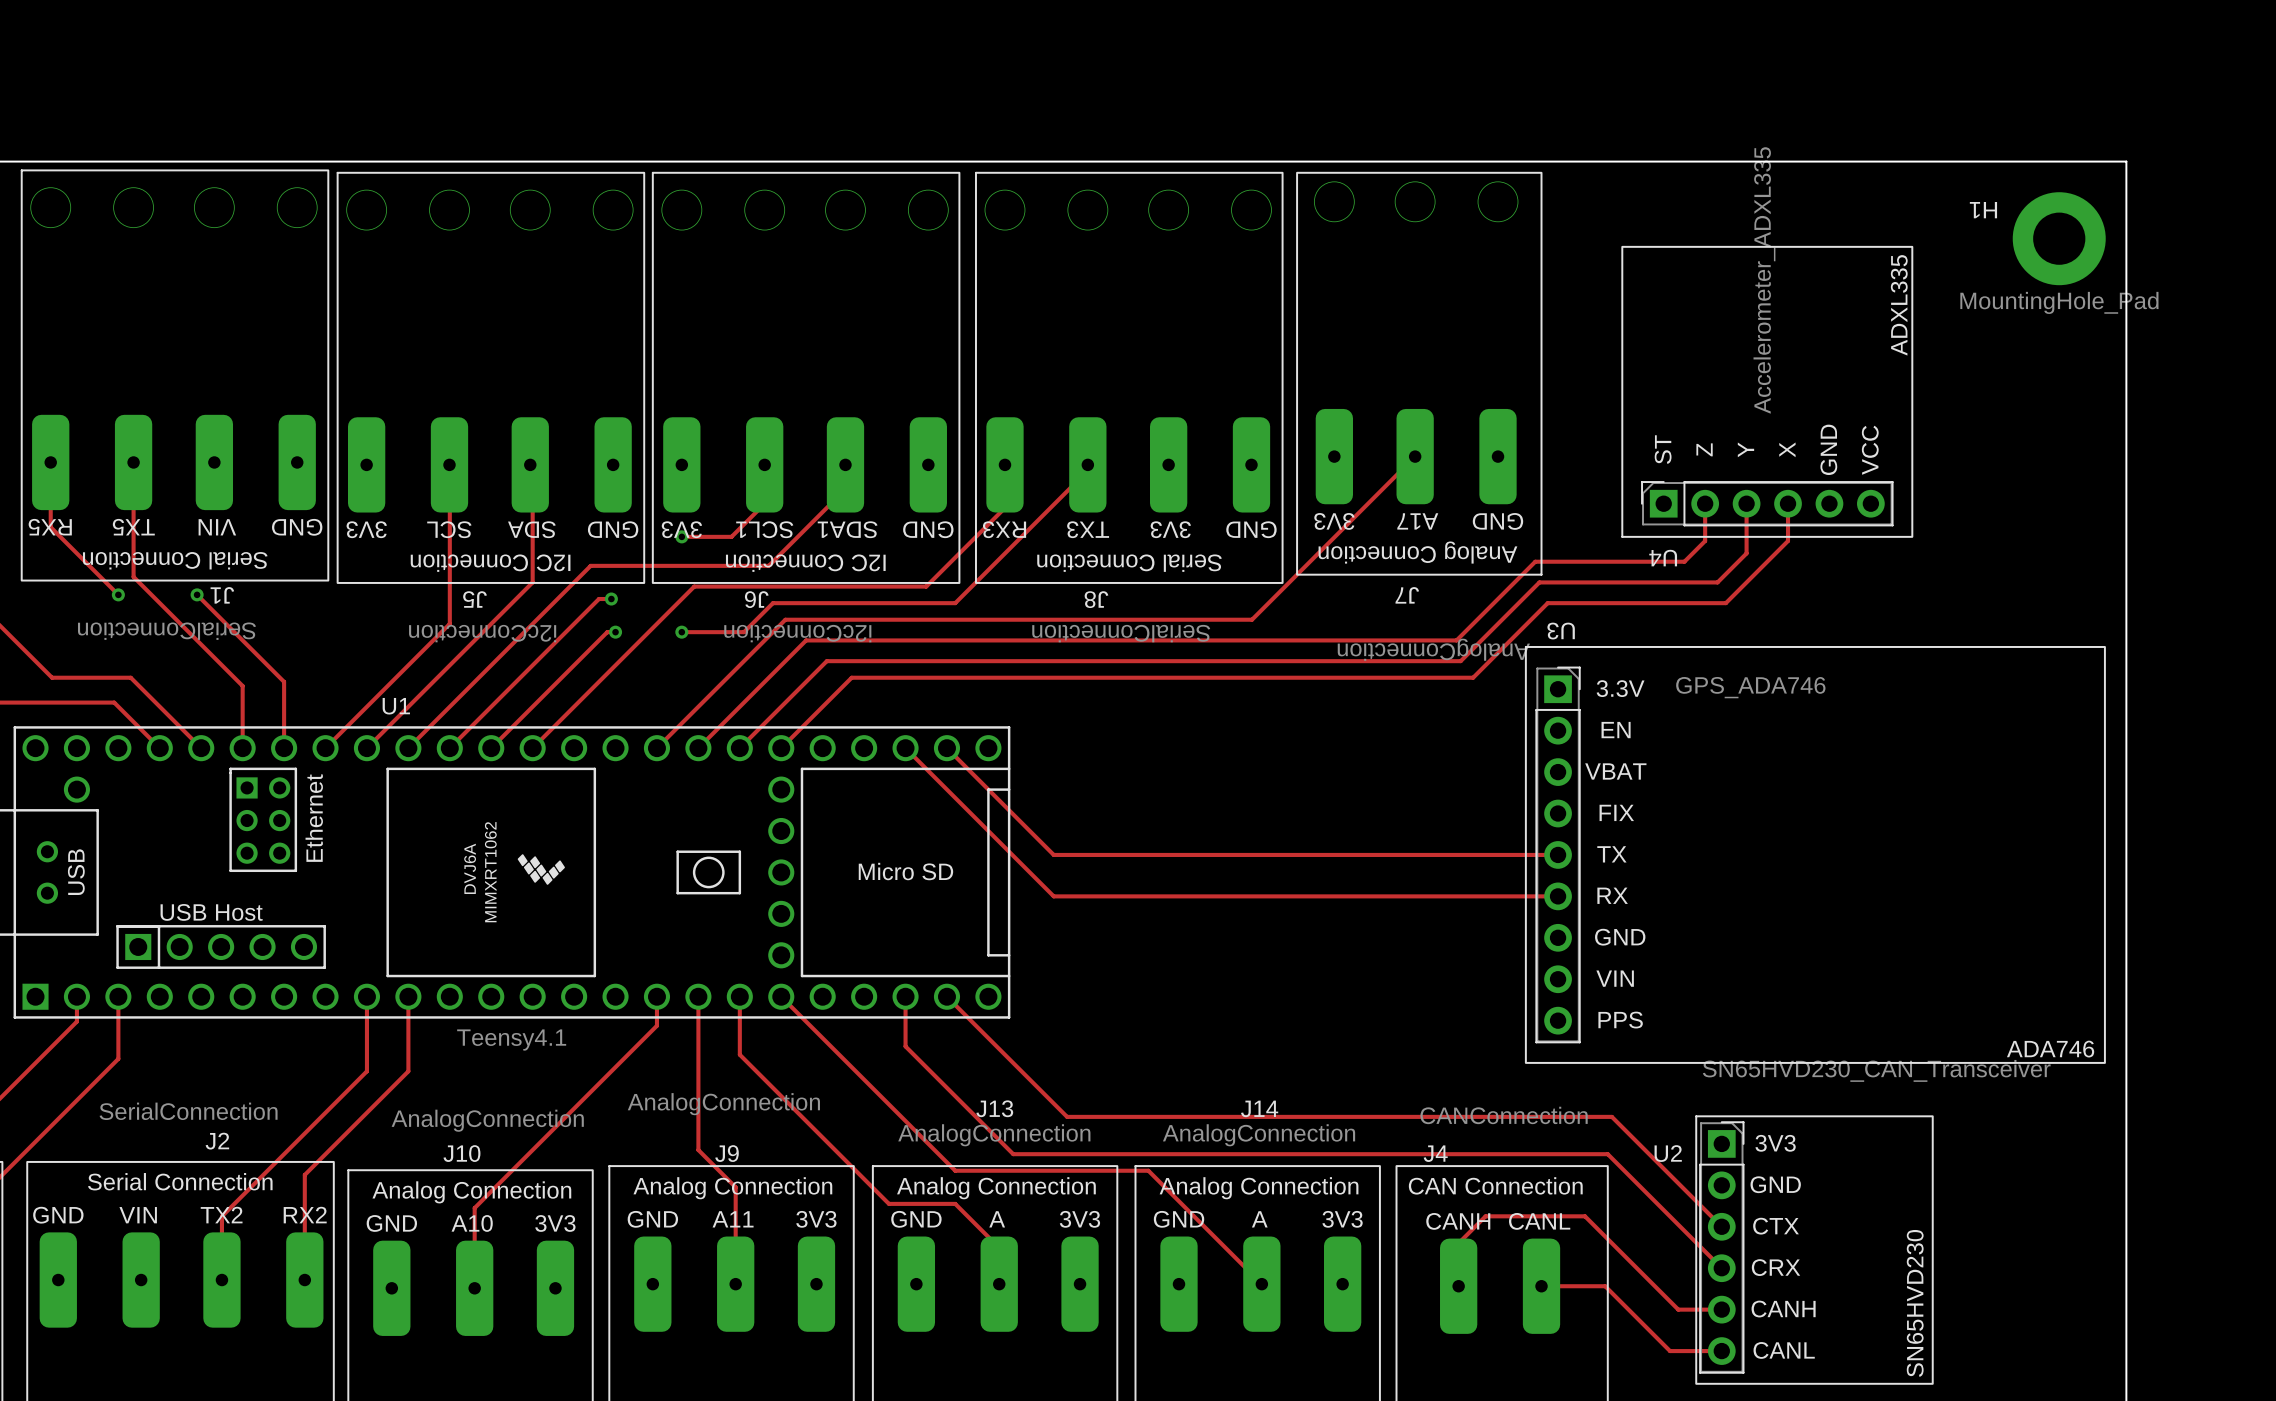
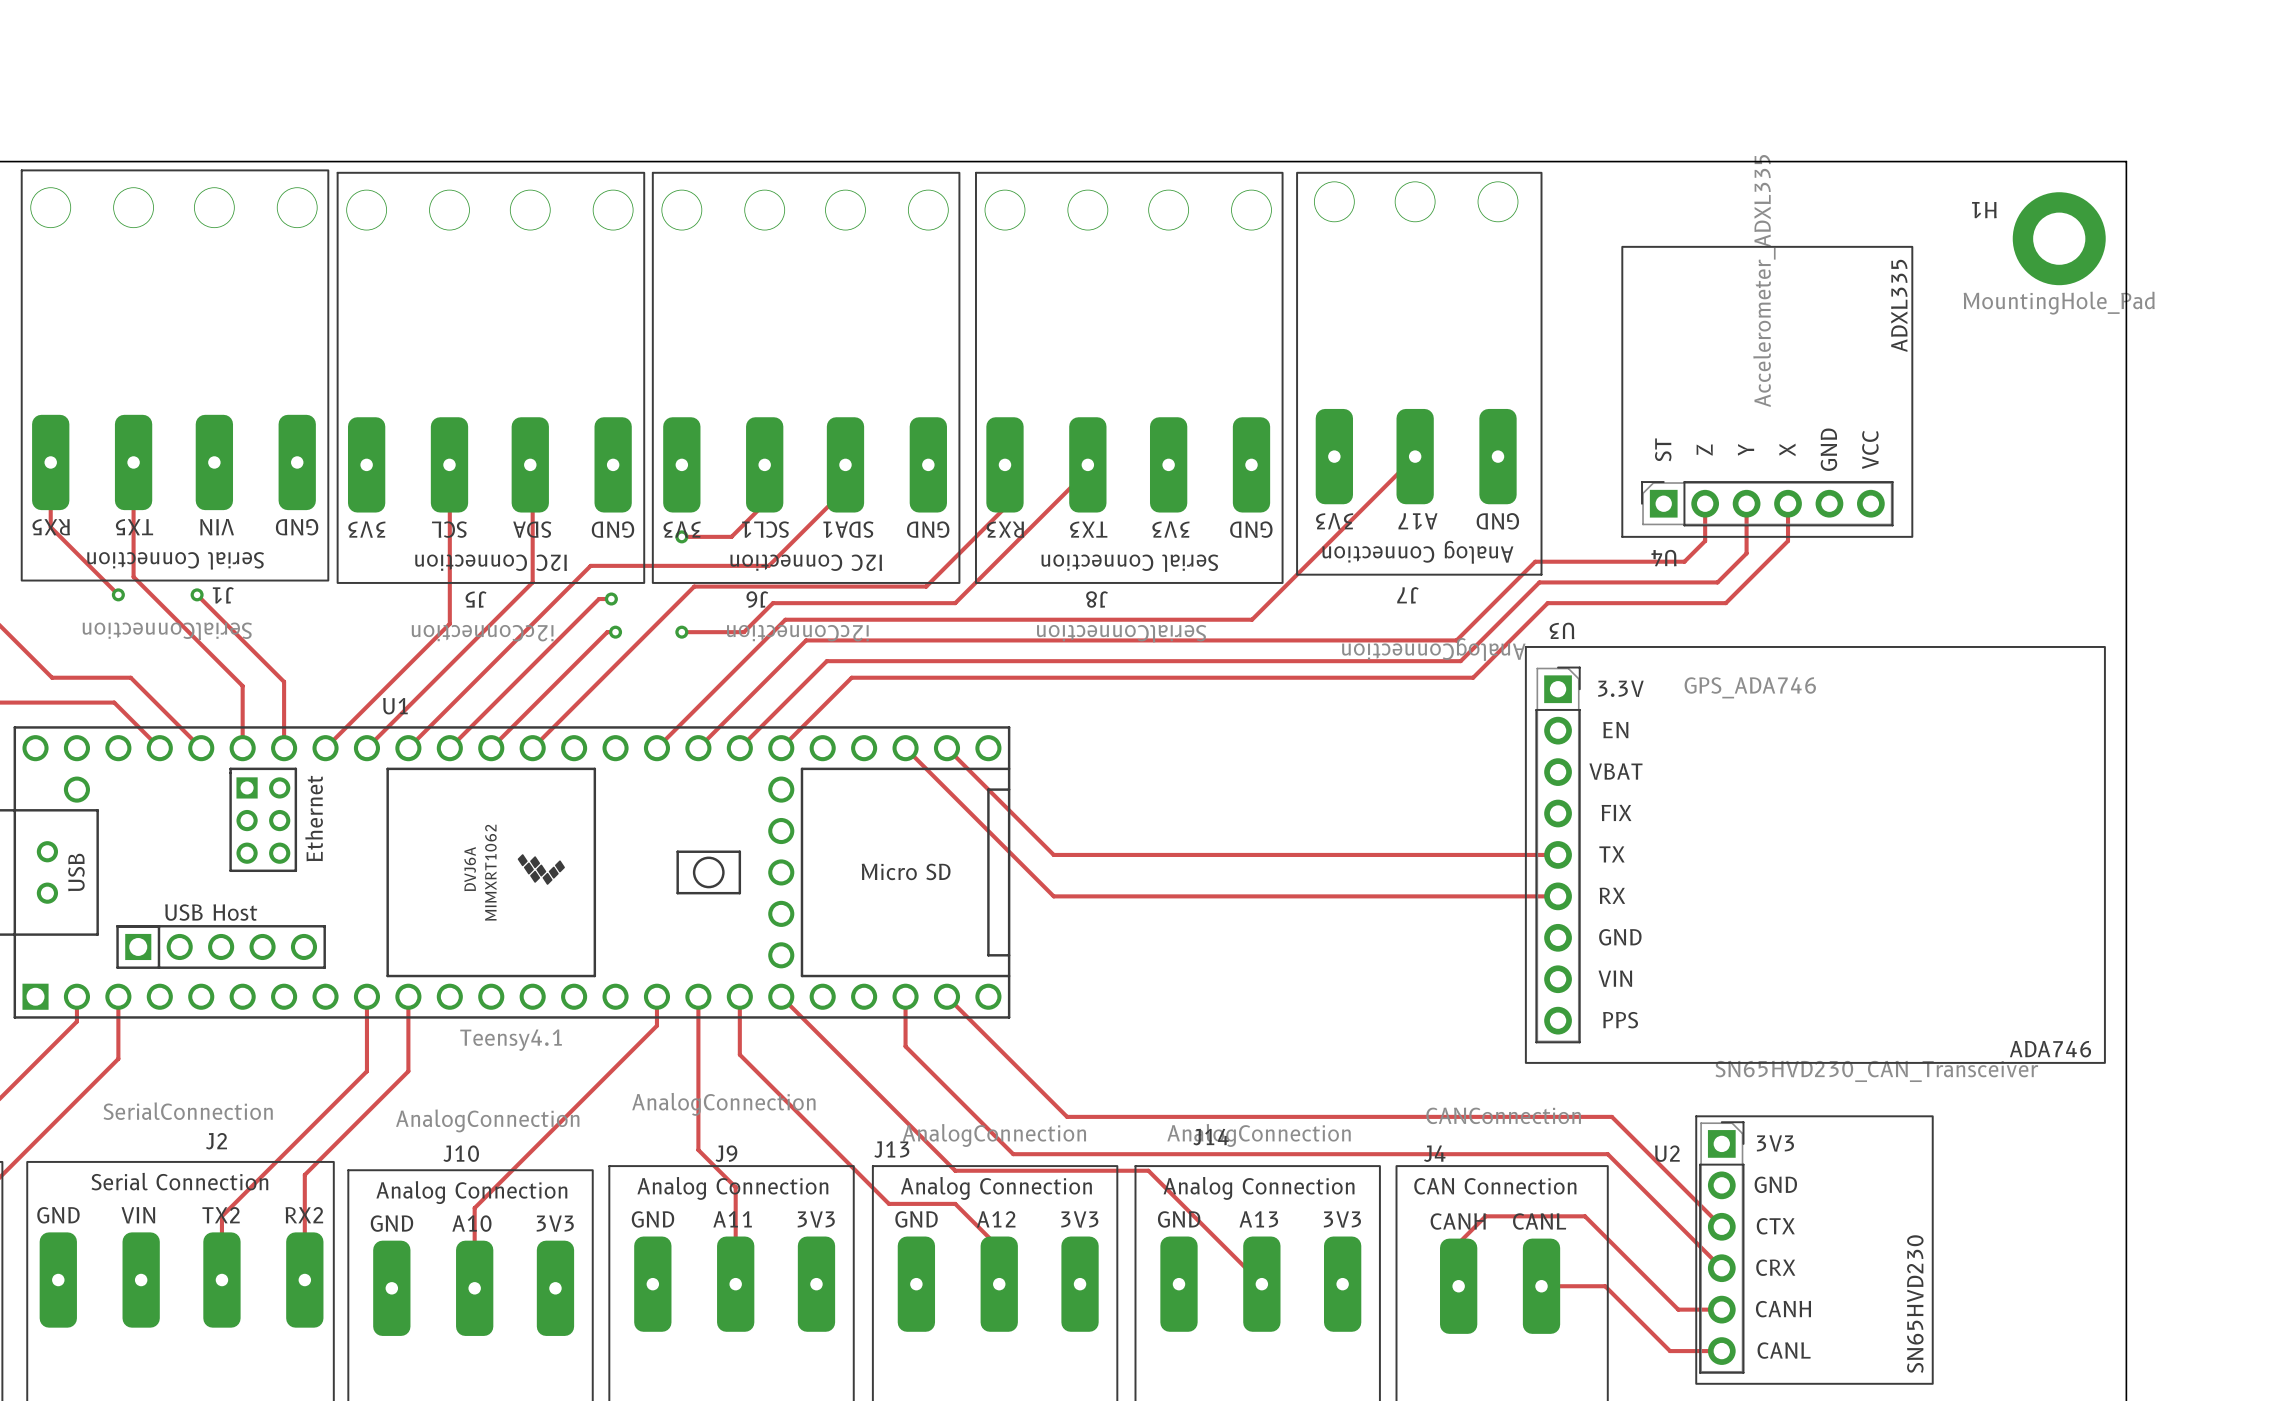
J13 name position: J13 (994, 1108) -> J13 (891, 1149)
J14 name position: J14 (1259, 1108) -> J14 (1211, 1137)
J13 text: A (997, 1219) -> A12 (996, 1219)
J14 text: A (1259, 1219) -> A13 (1258, 1219)

